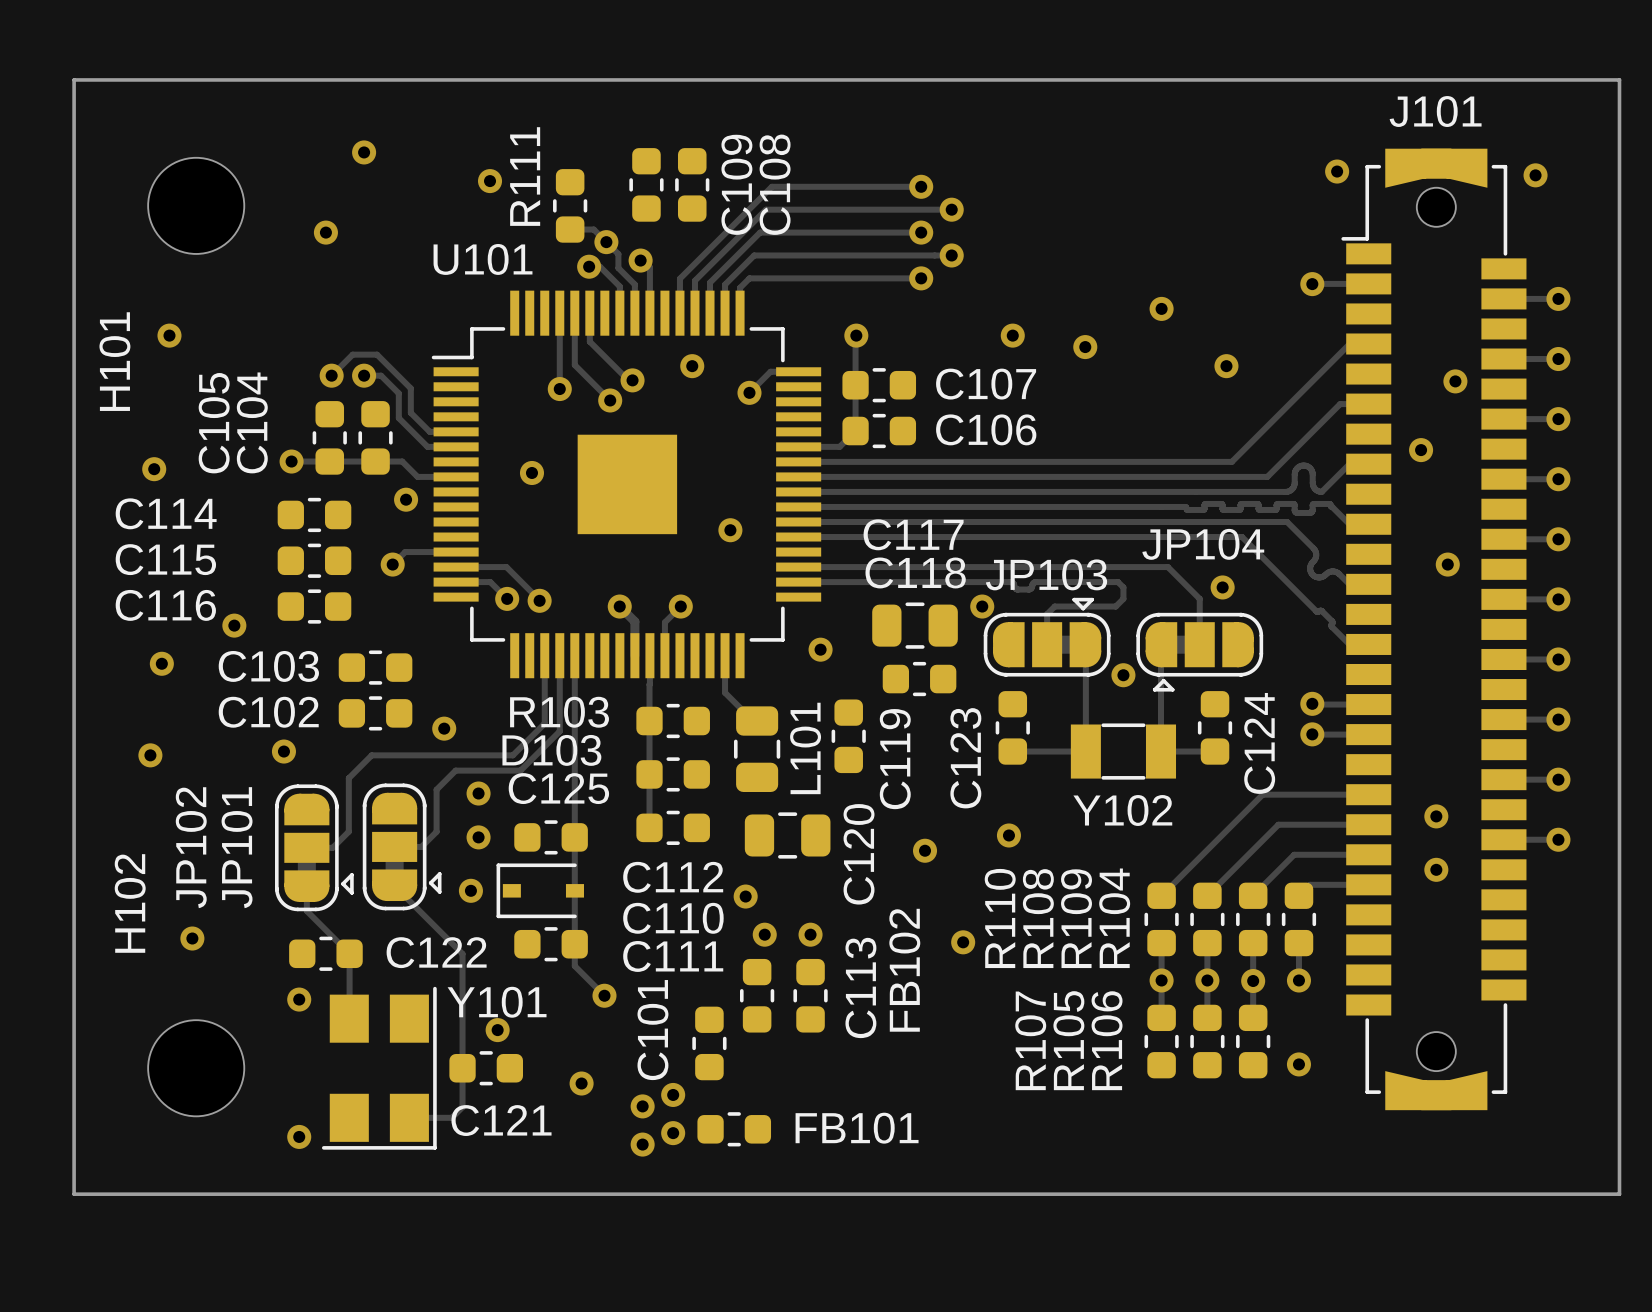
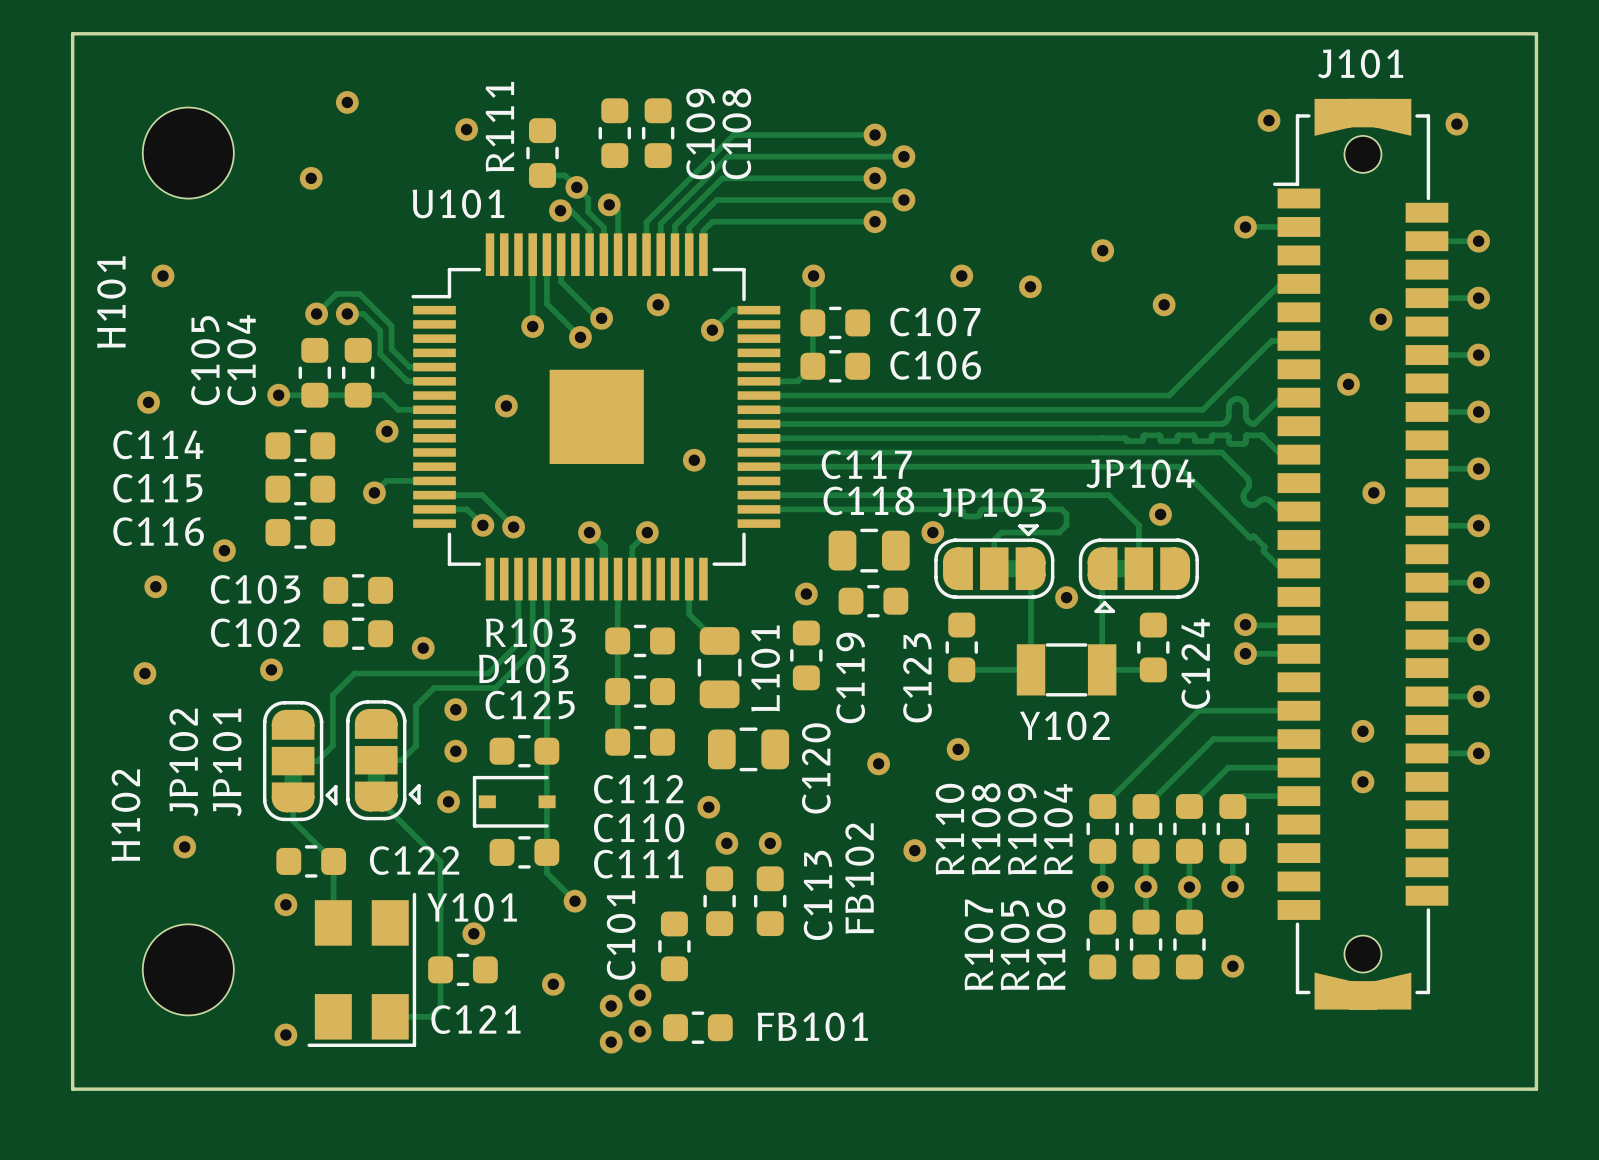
via position: (820, 649) -> (806, 593)

